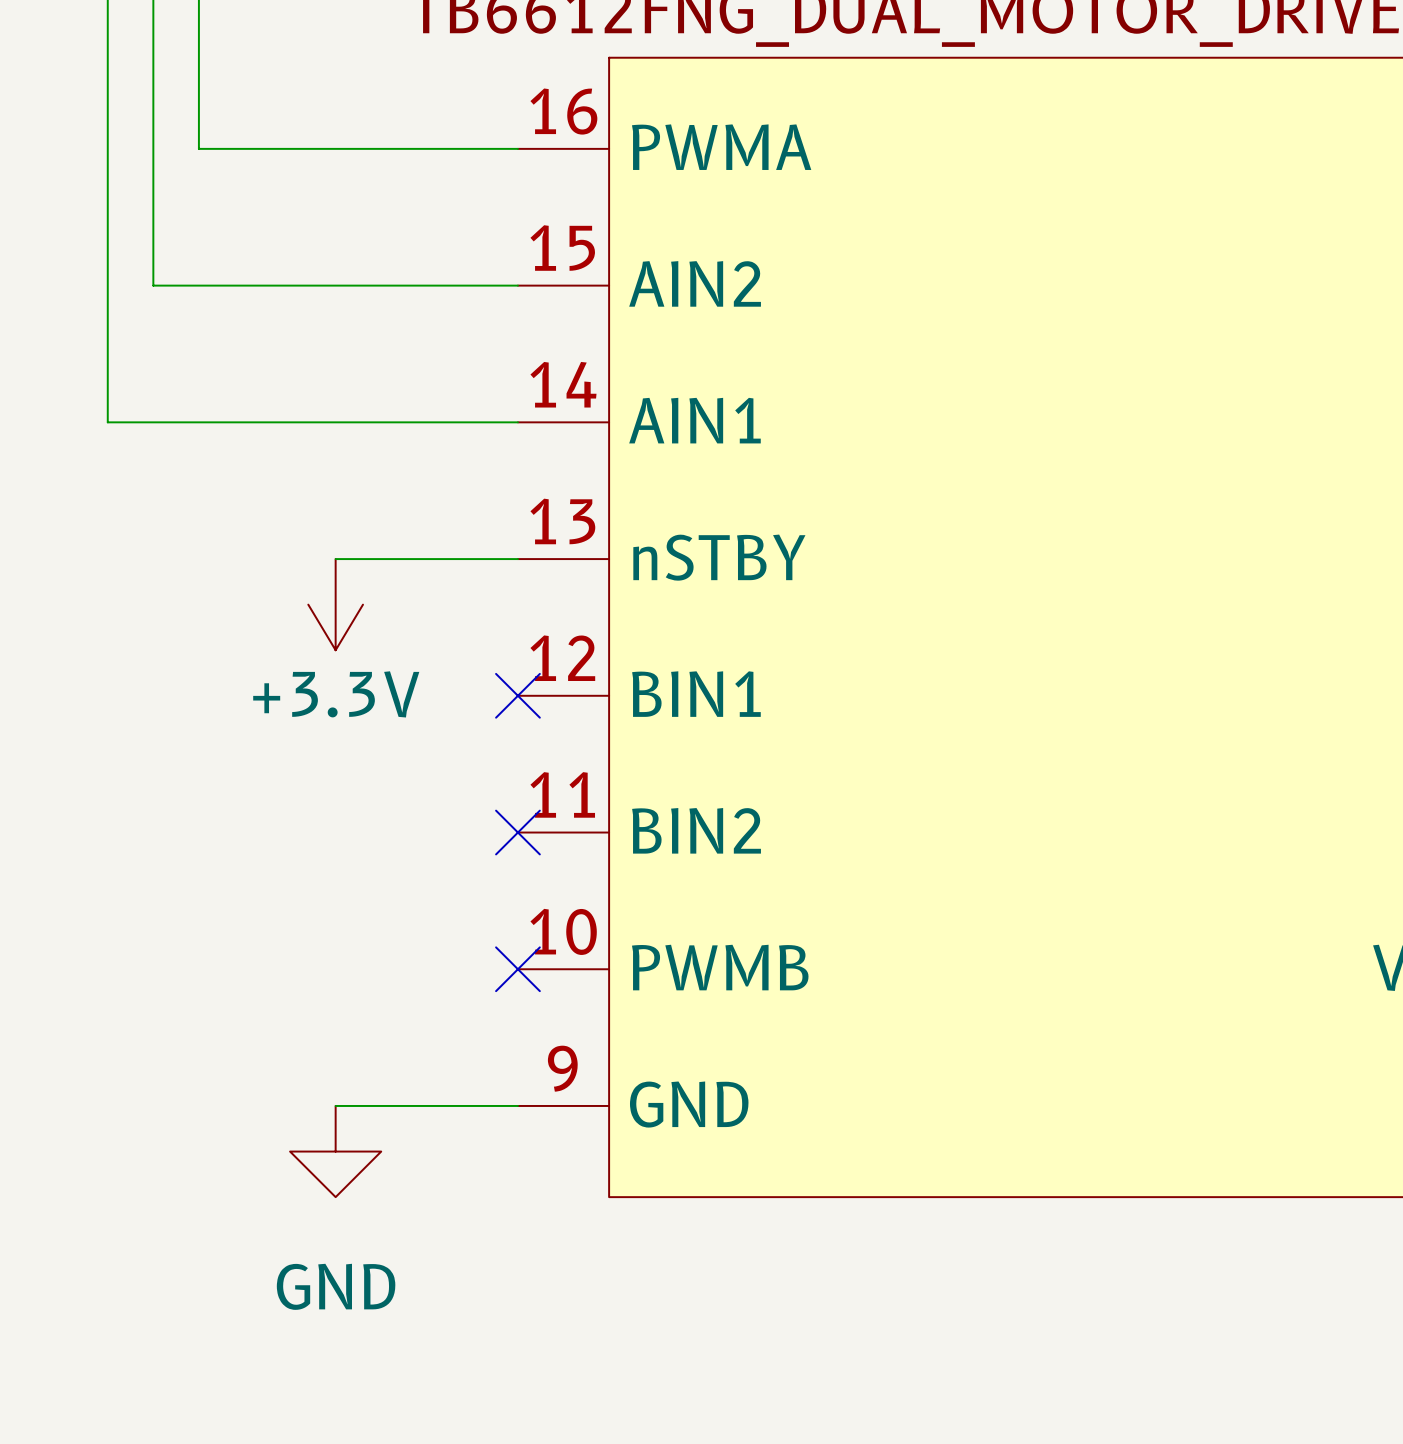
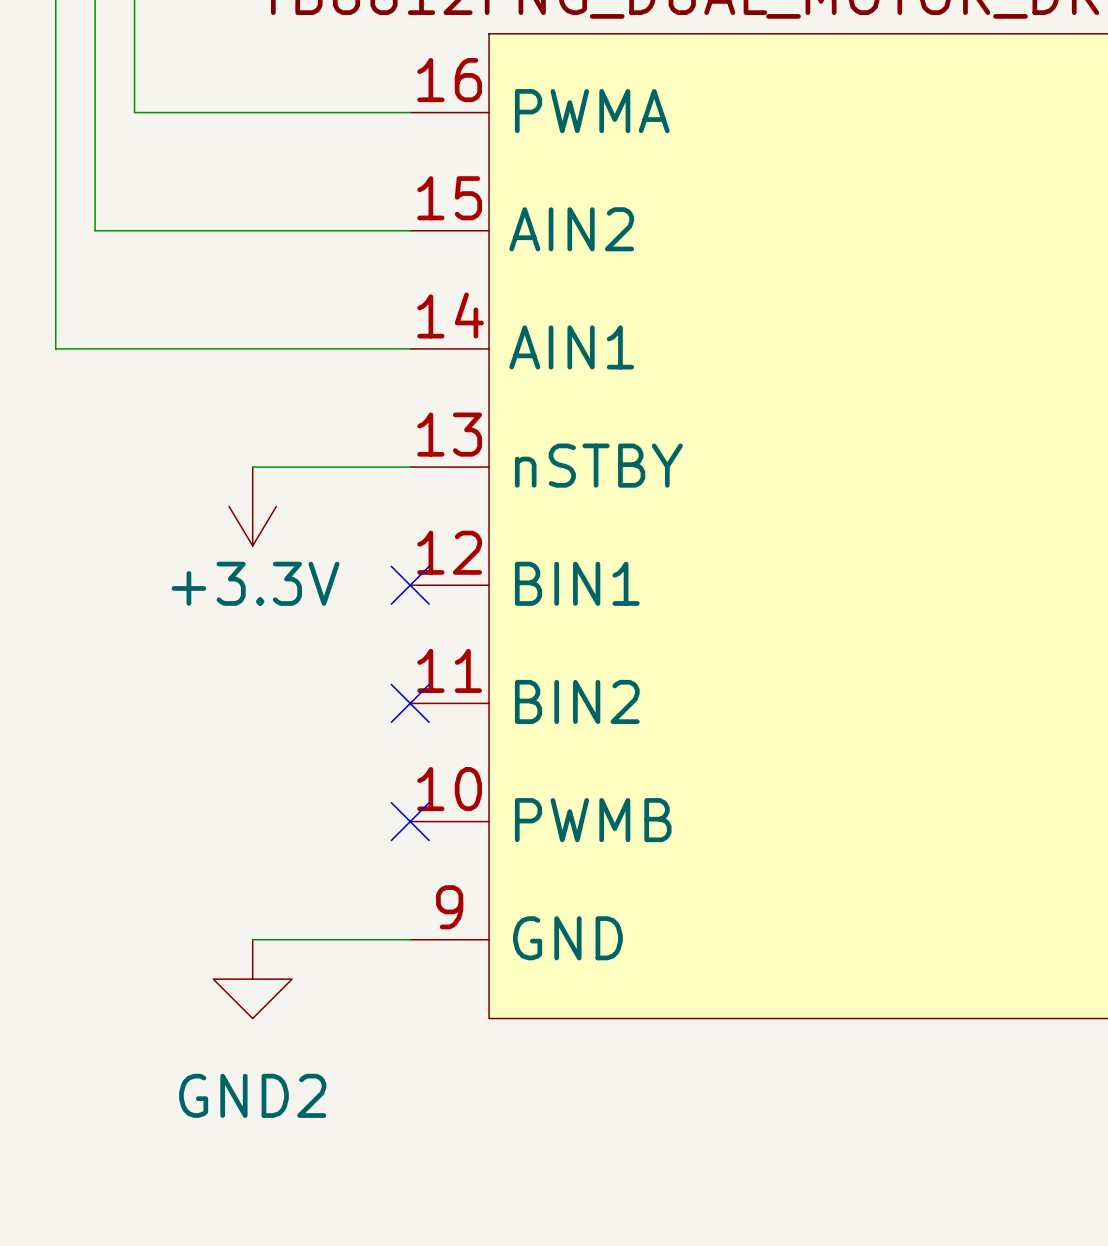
power symbol: GND (335, 1151) -> GND2 (252, 979)

